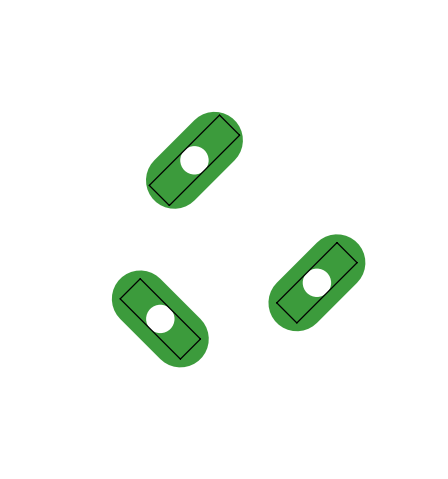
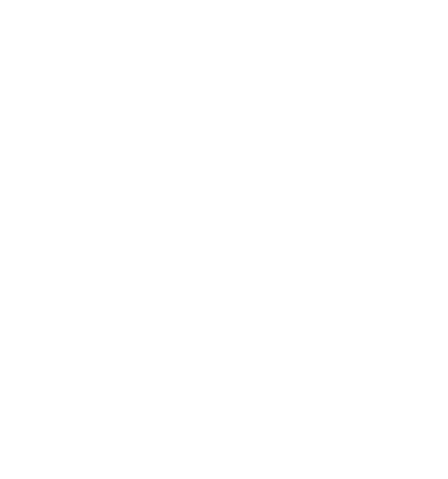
part: (238, 239) -> none

